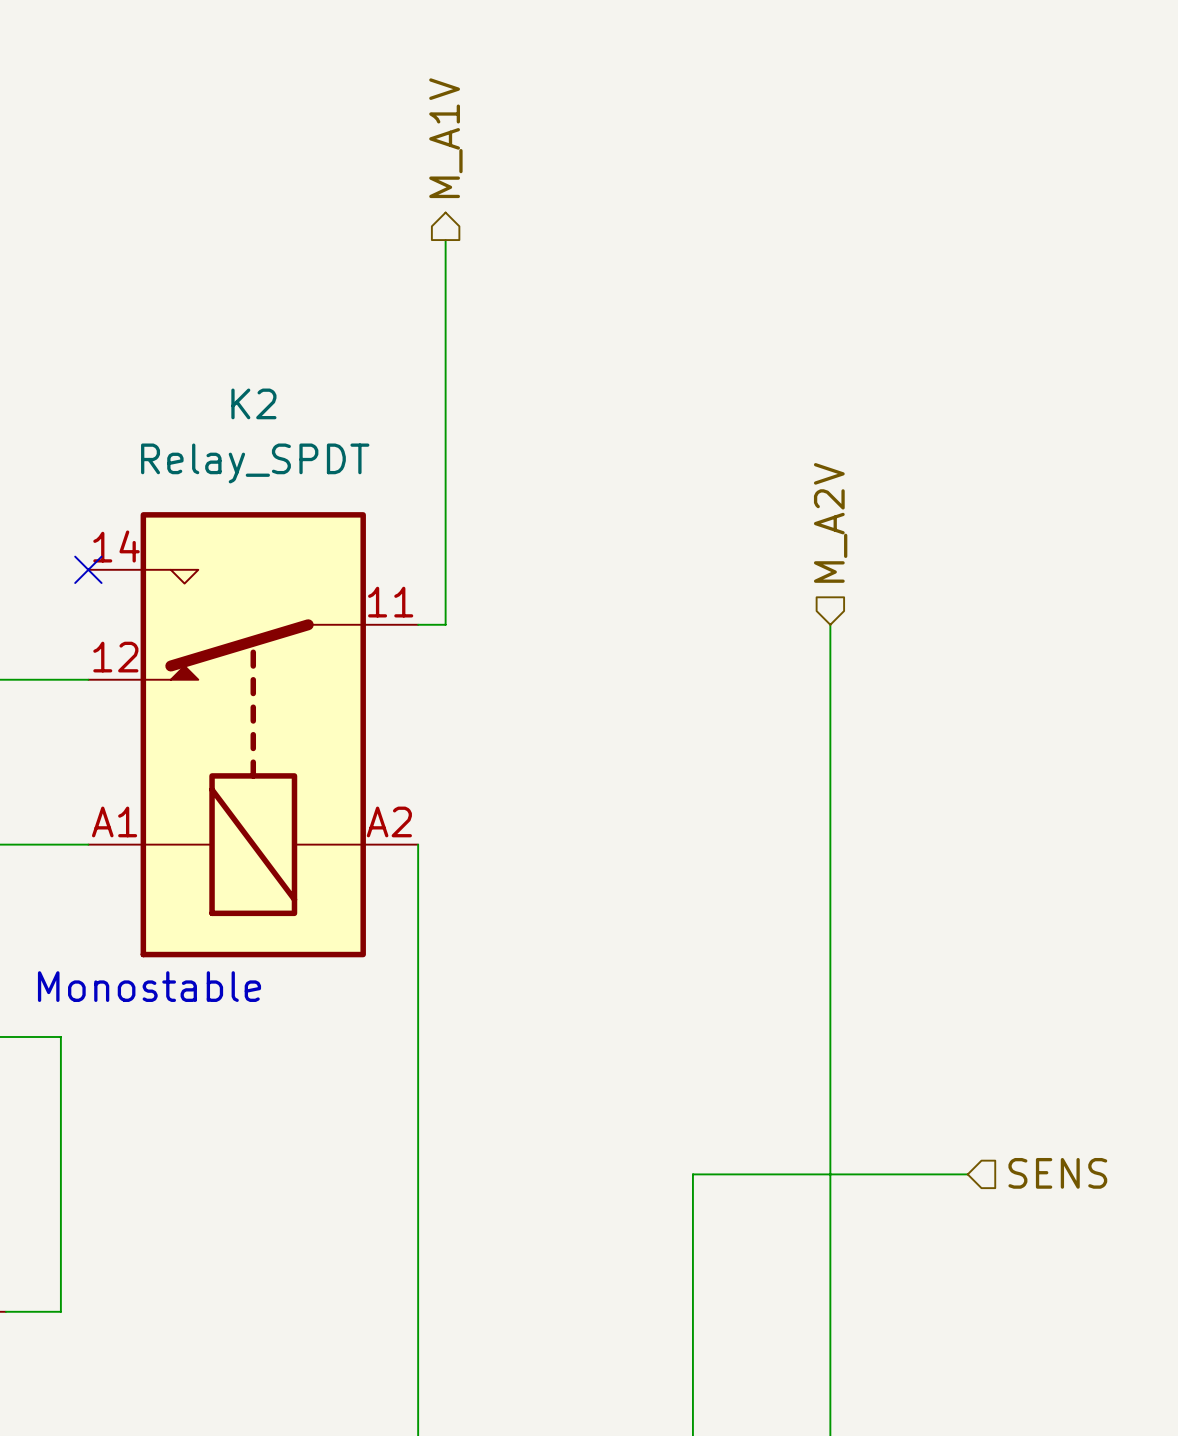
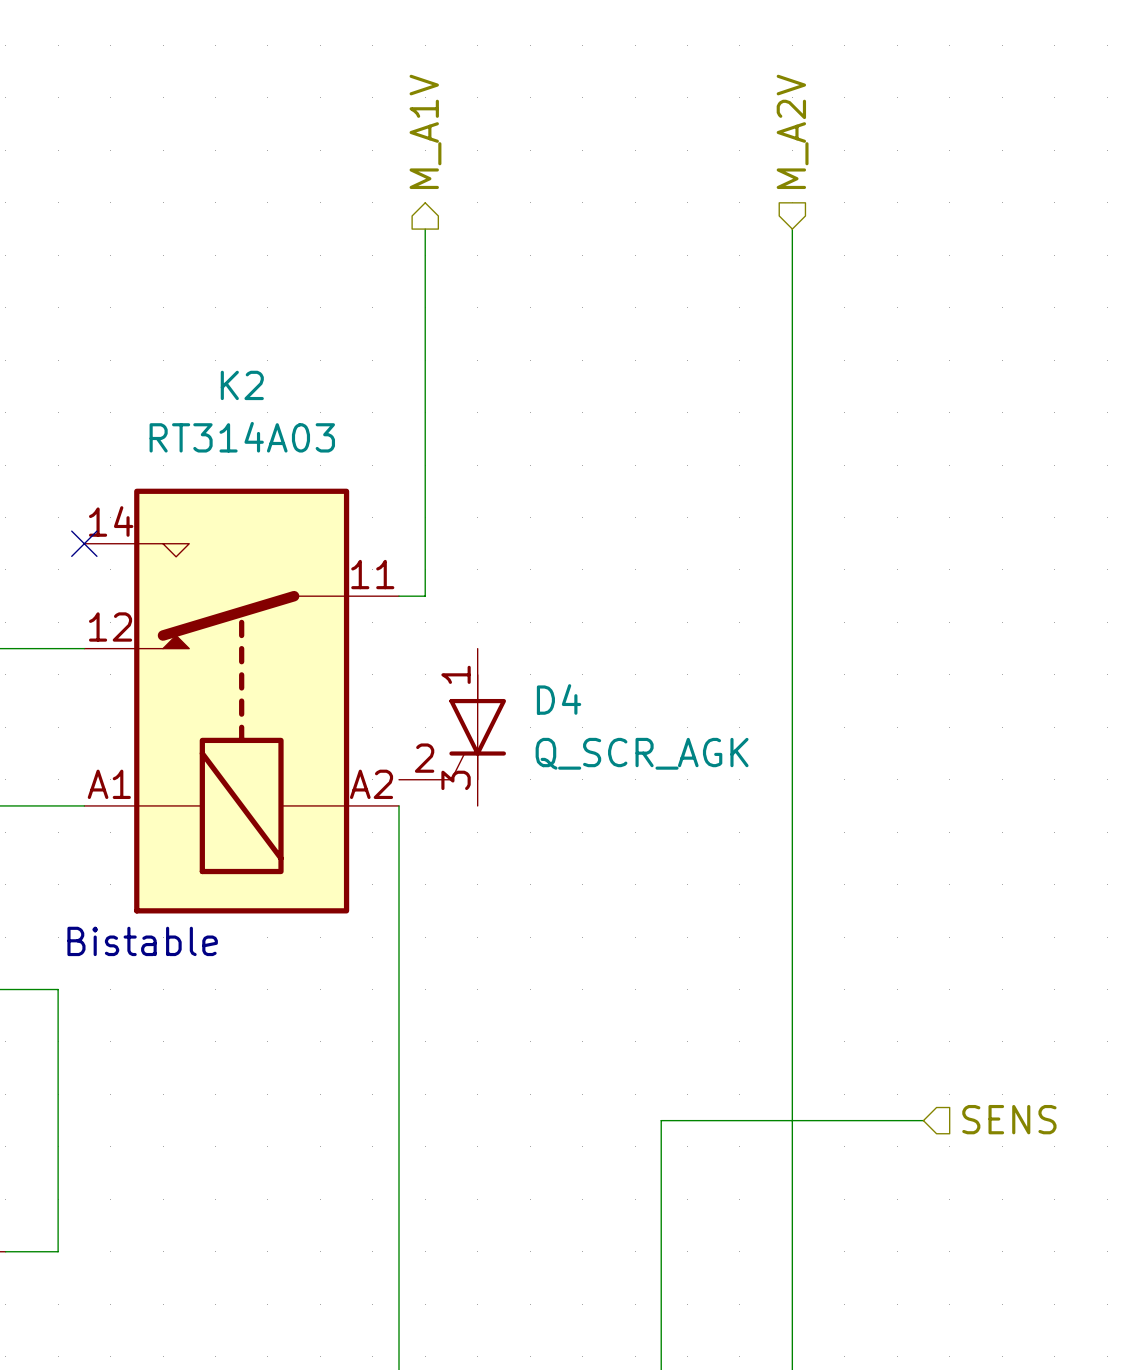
wire: none -> (792, 229) (792, 596)
K2 value: Relay_SPDT (255, 463) -> RT314A03 (242, 437)
hierarchical label position: M_A2V (830, 522) -> M_A2V (792, 131)
D4: none -> Q_SCR_AGK (452, 727)
text: Monostable (149, 986) -> Bistable (142, 941)

